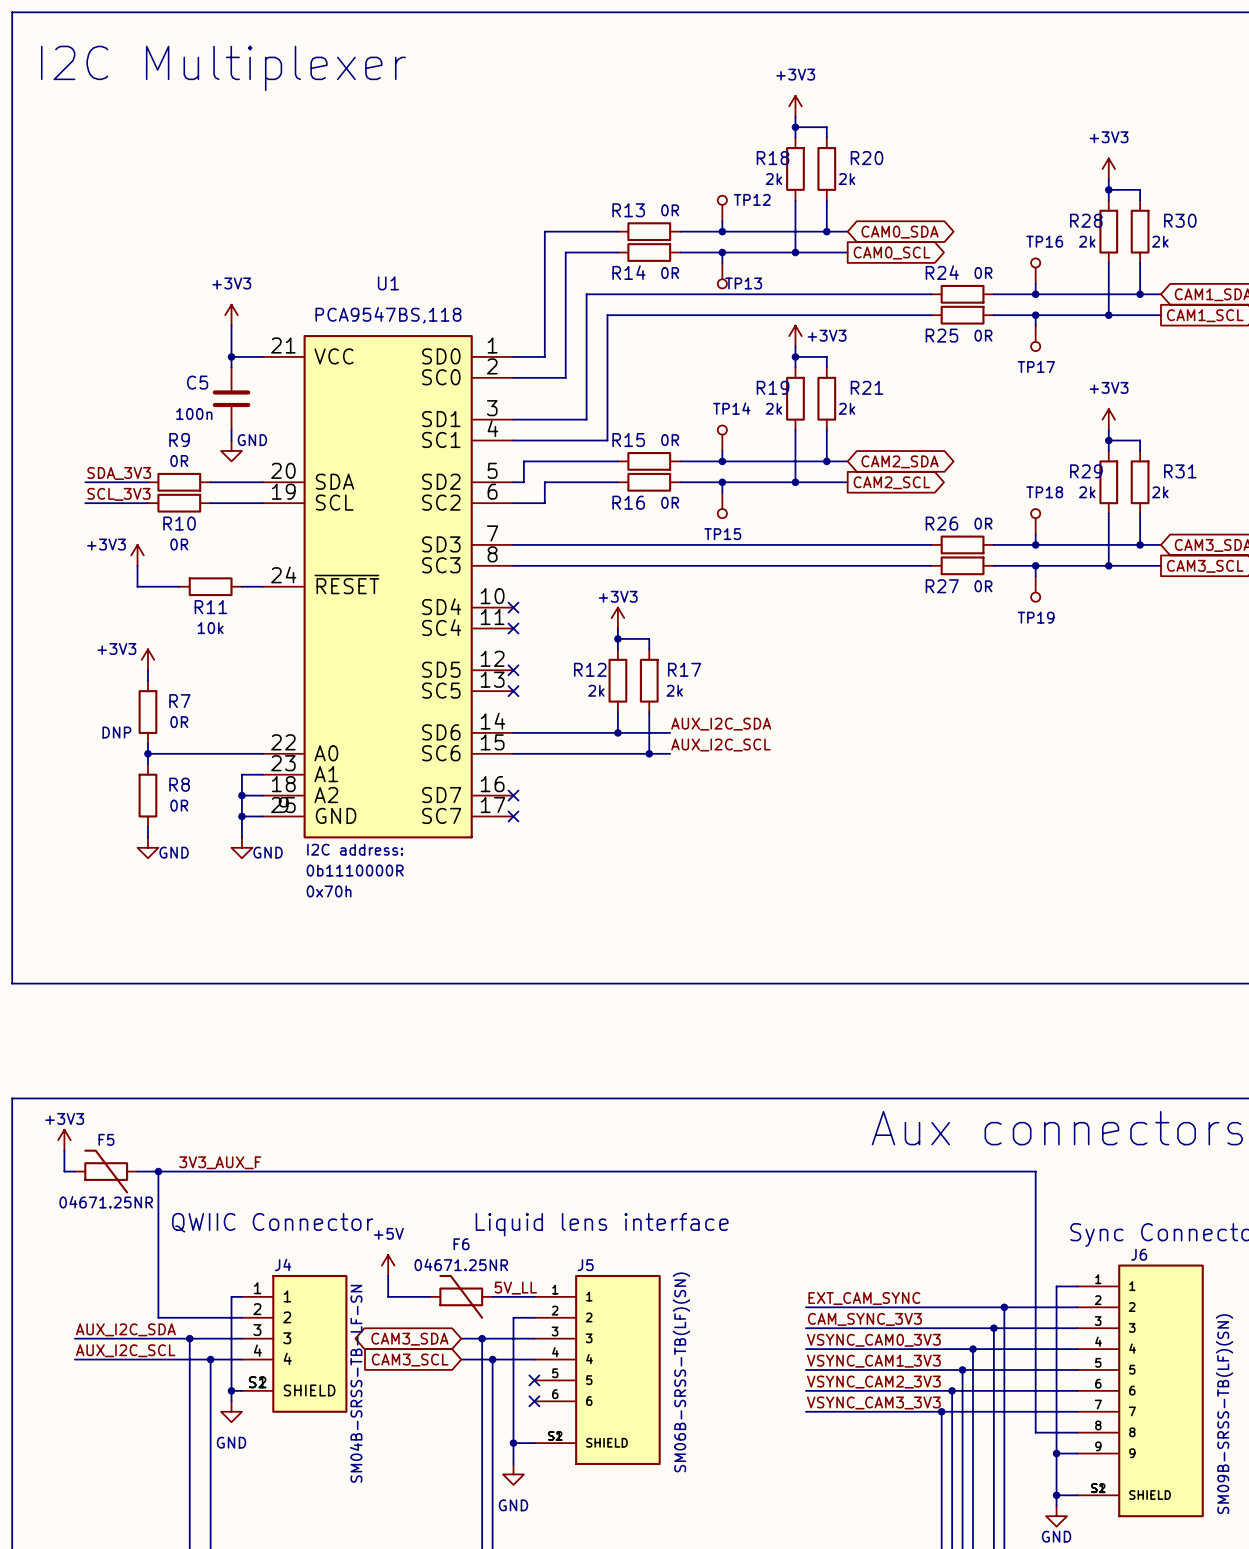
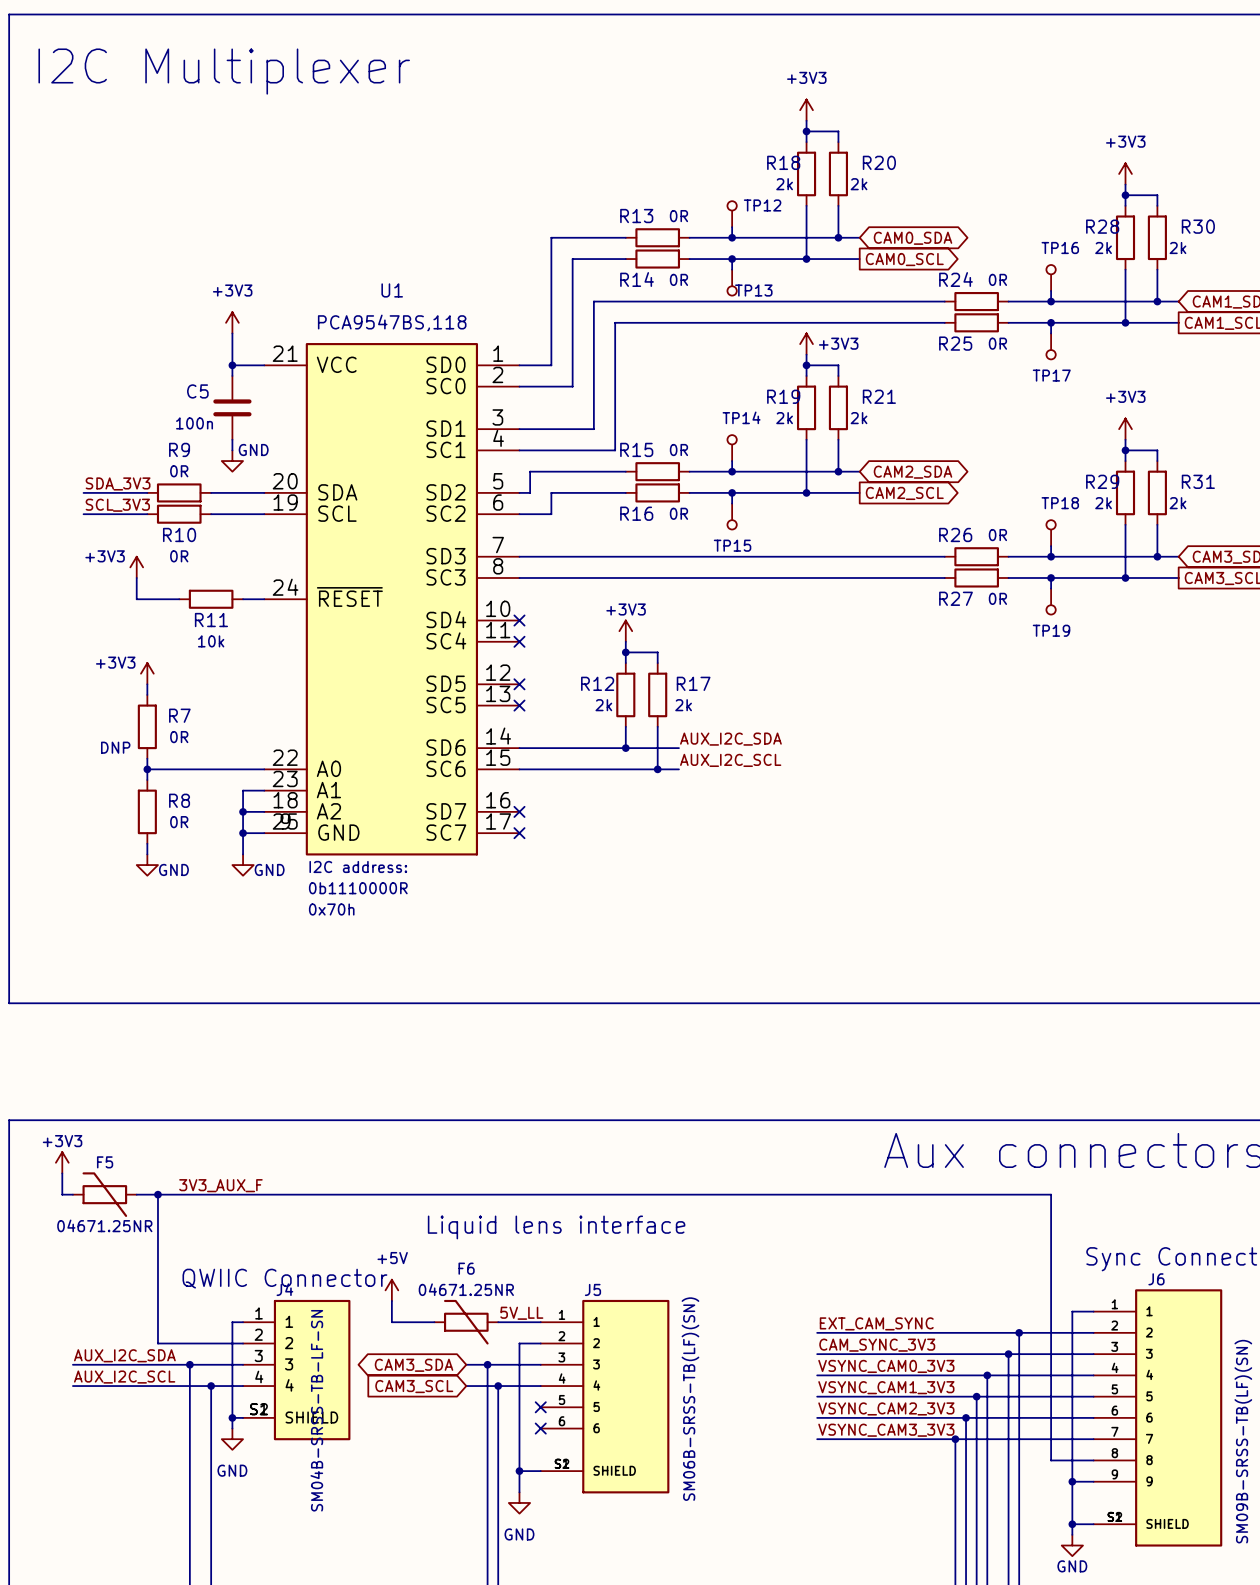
text position: QWIIC Connector (272, 1222) -> QWIIC Connector (284, 1278)
text position: Liquid lens interface (602, 1224) -> Liquid lens interface (556, 1227)
J4 value position: SM04B-SRSS-TB-LF-SN (356, 1383) -> SM04B-SRSS-TB-LF-SN (316, 1410)

